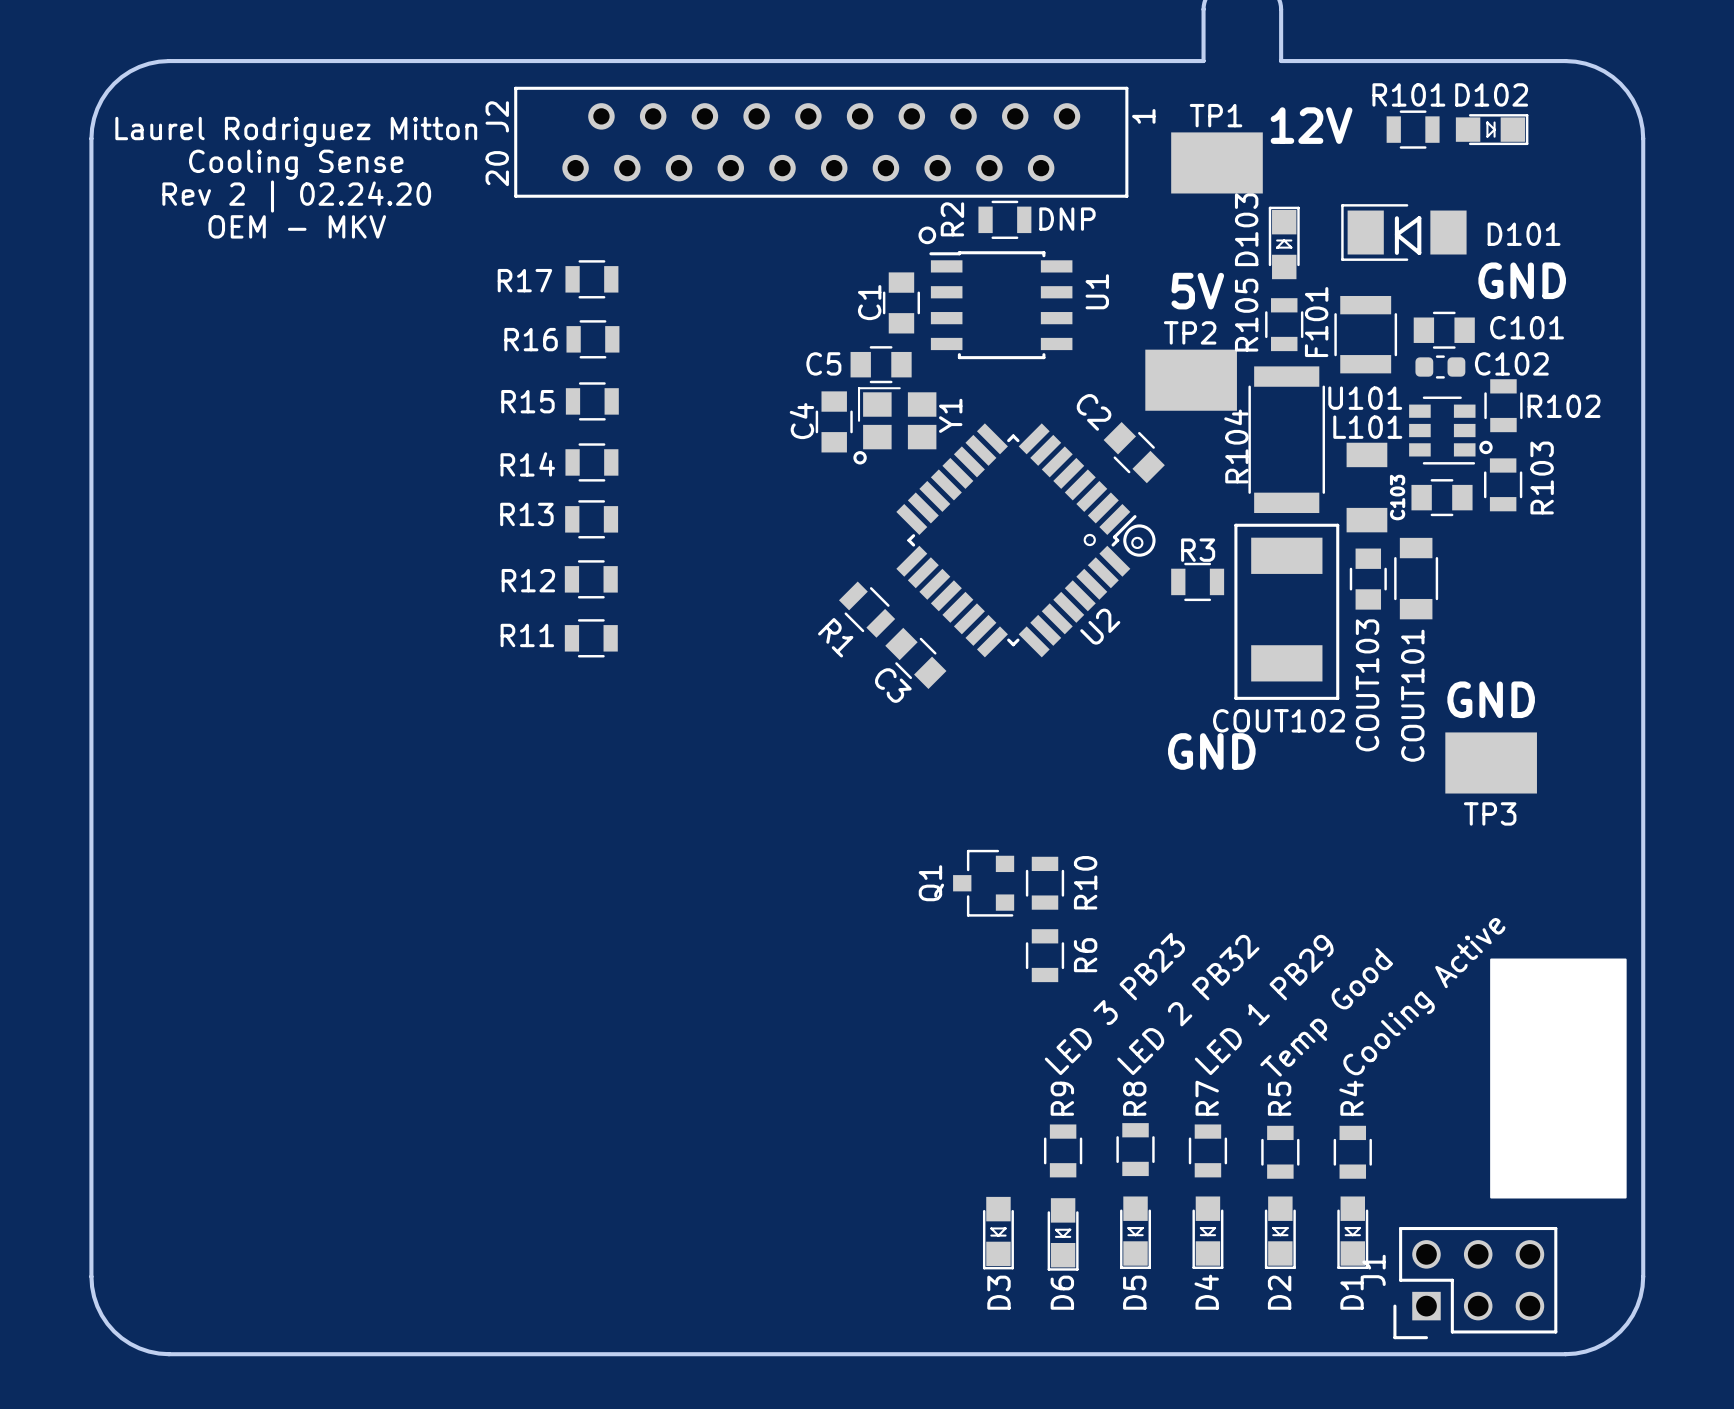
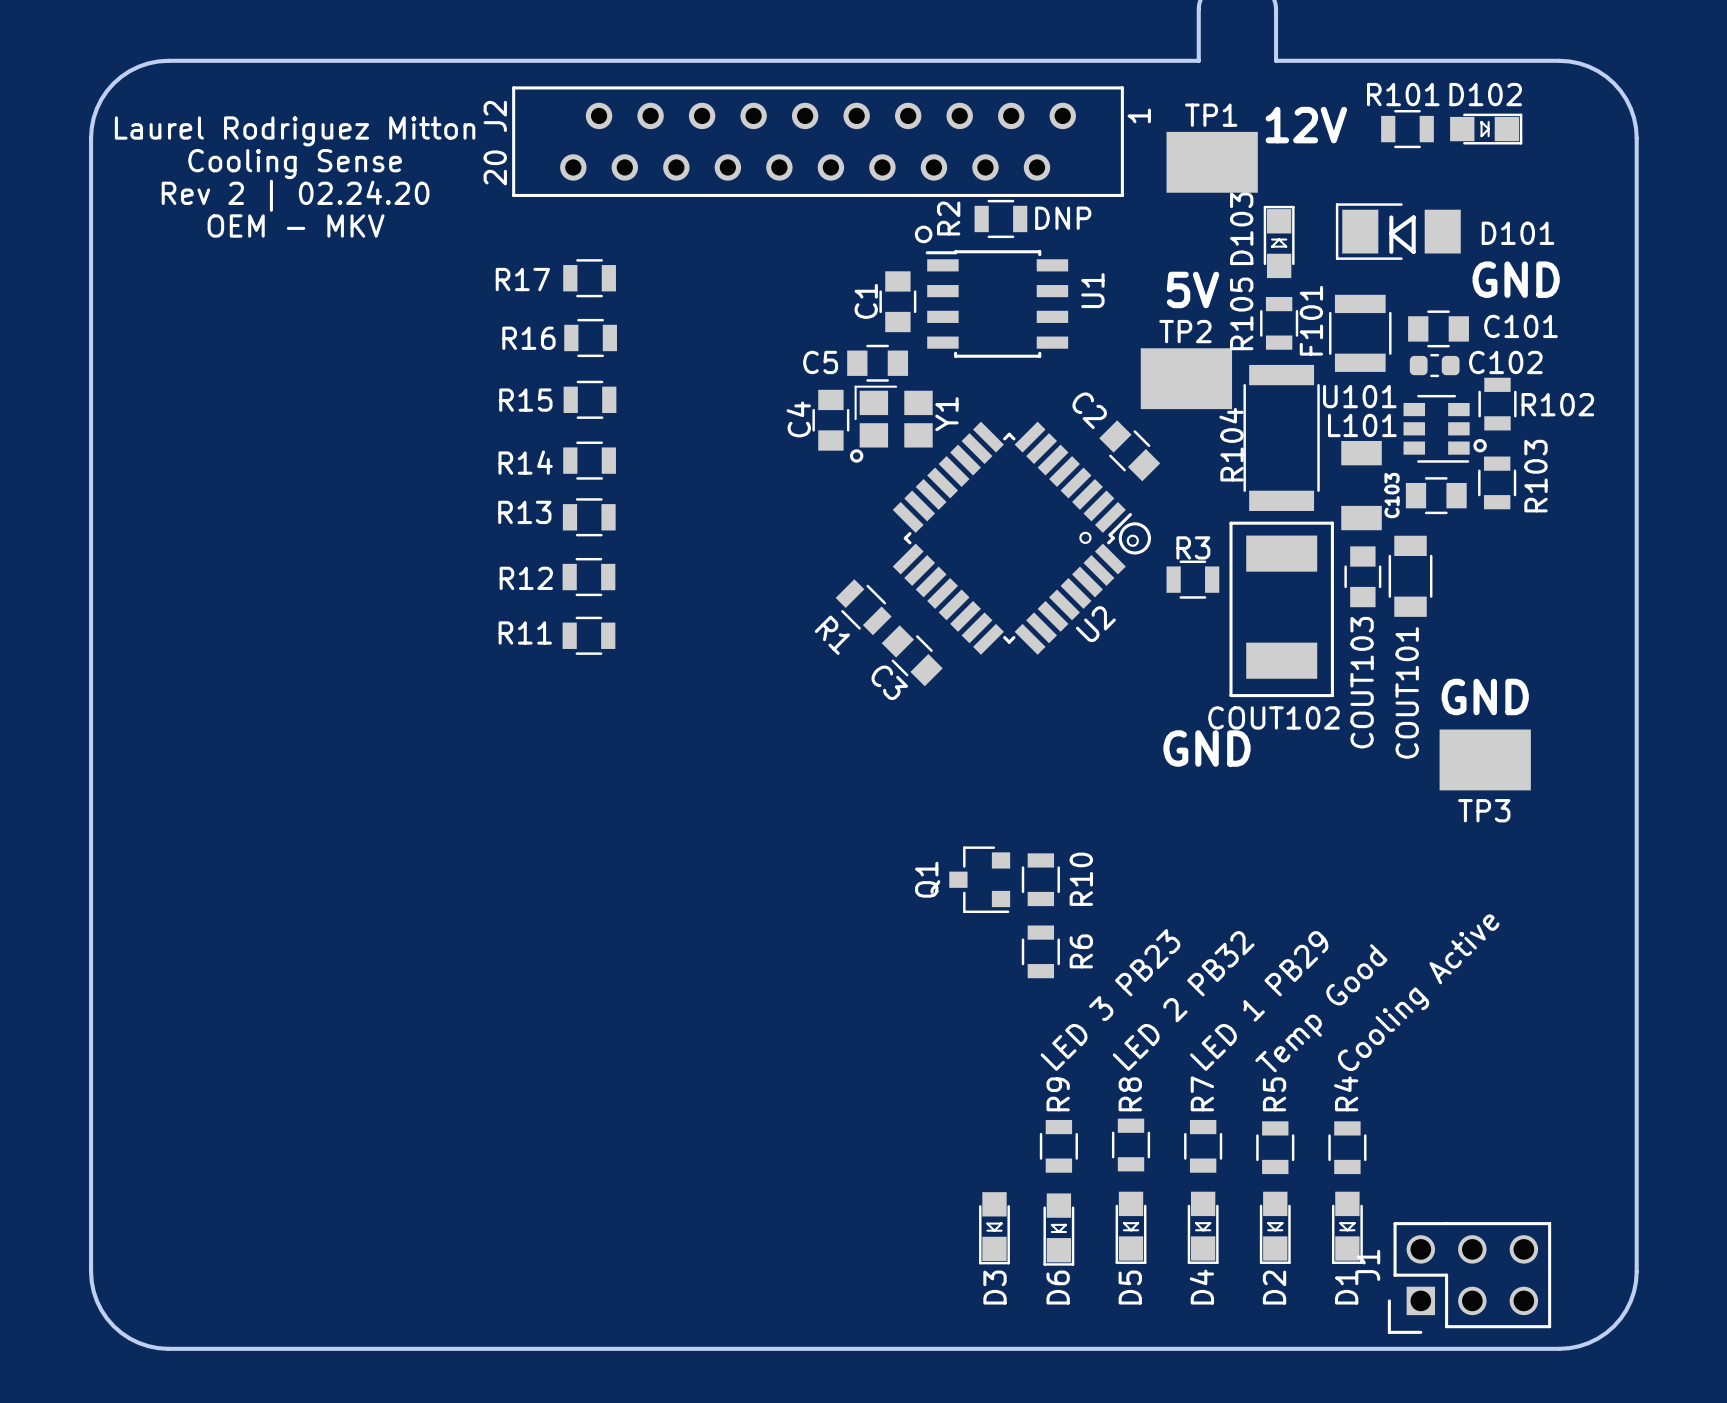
drawing: [1490, 958, 1627, 1199] -> none

